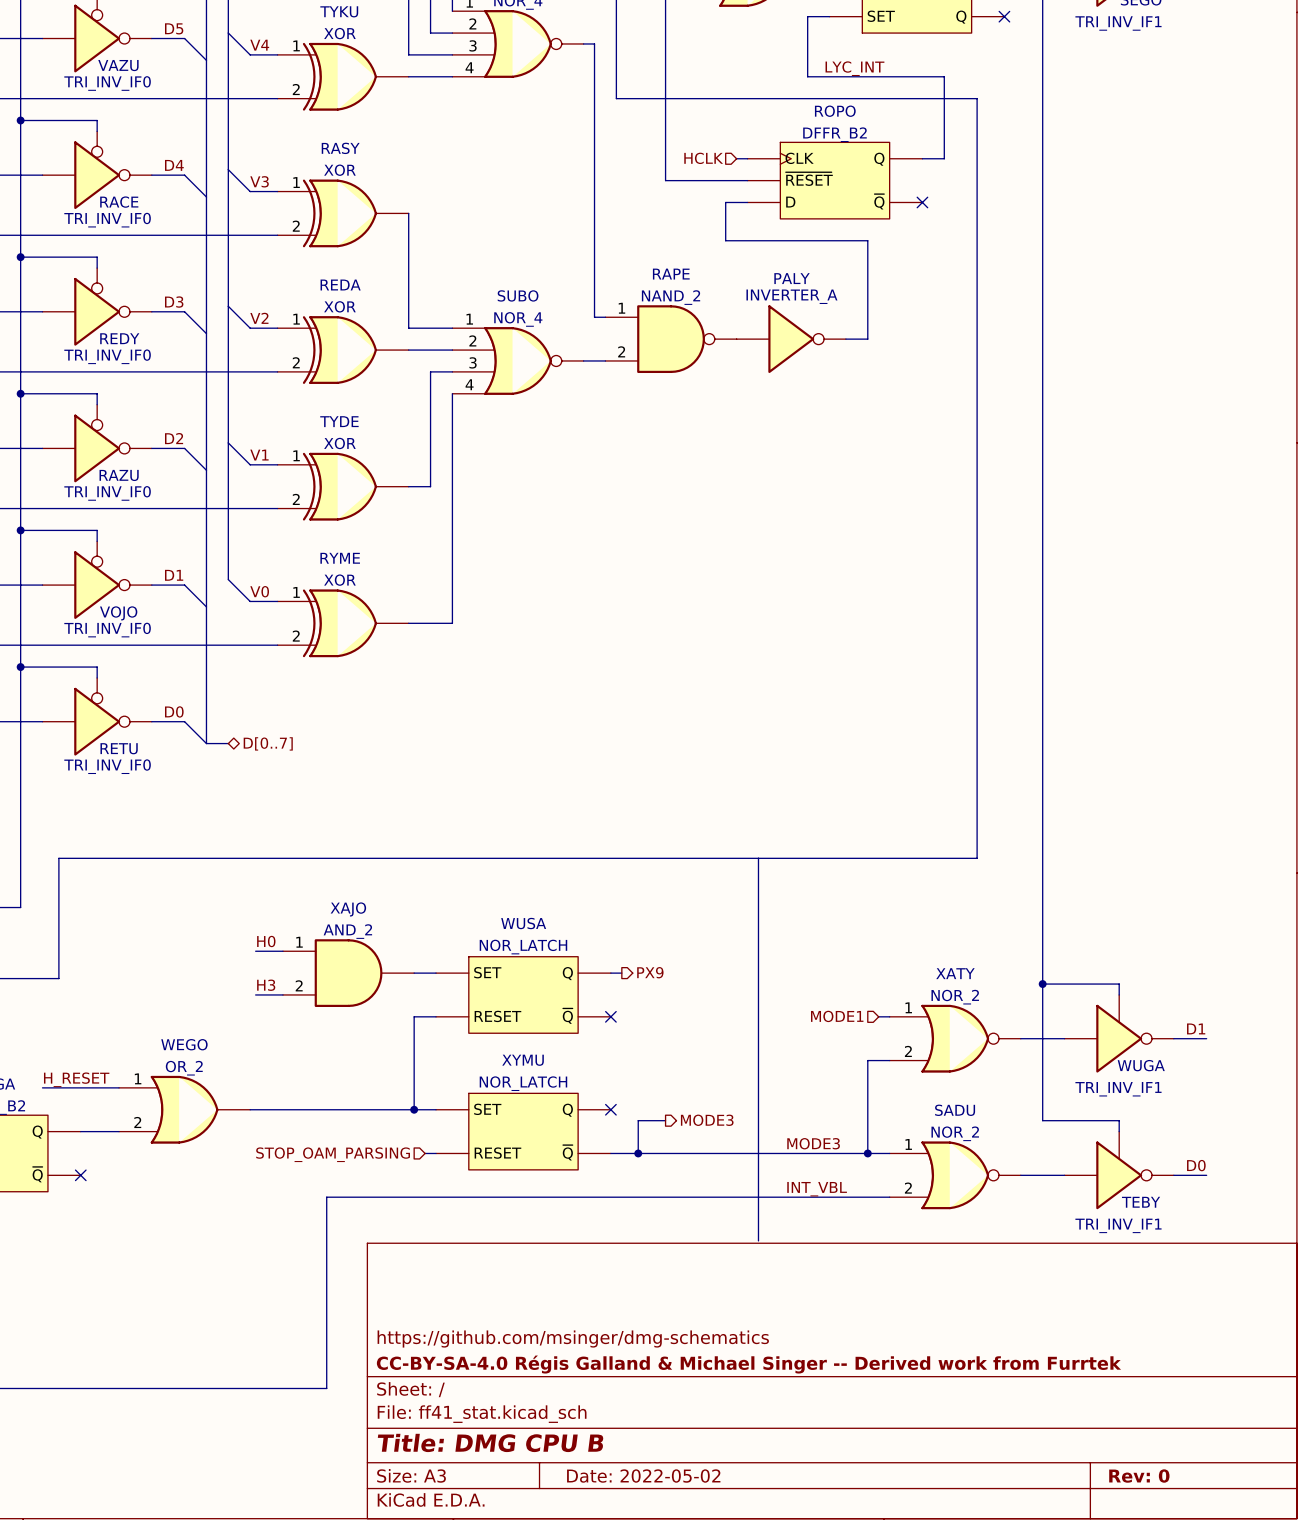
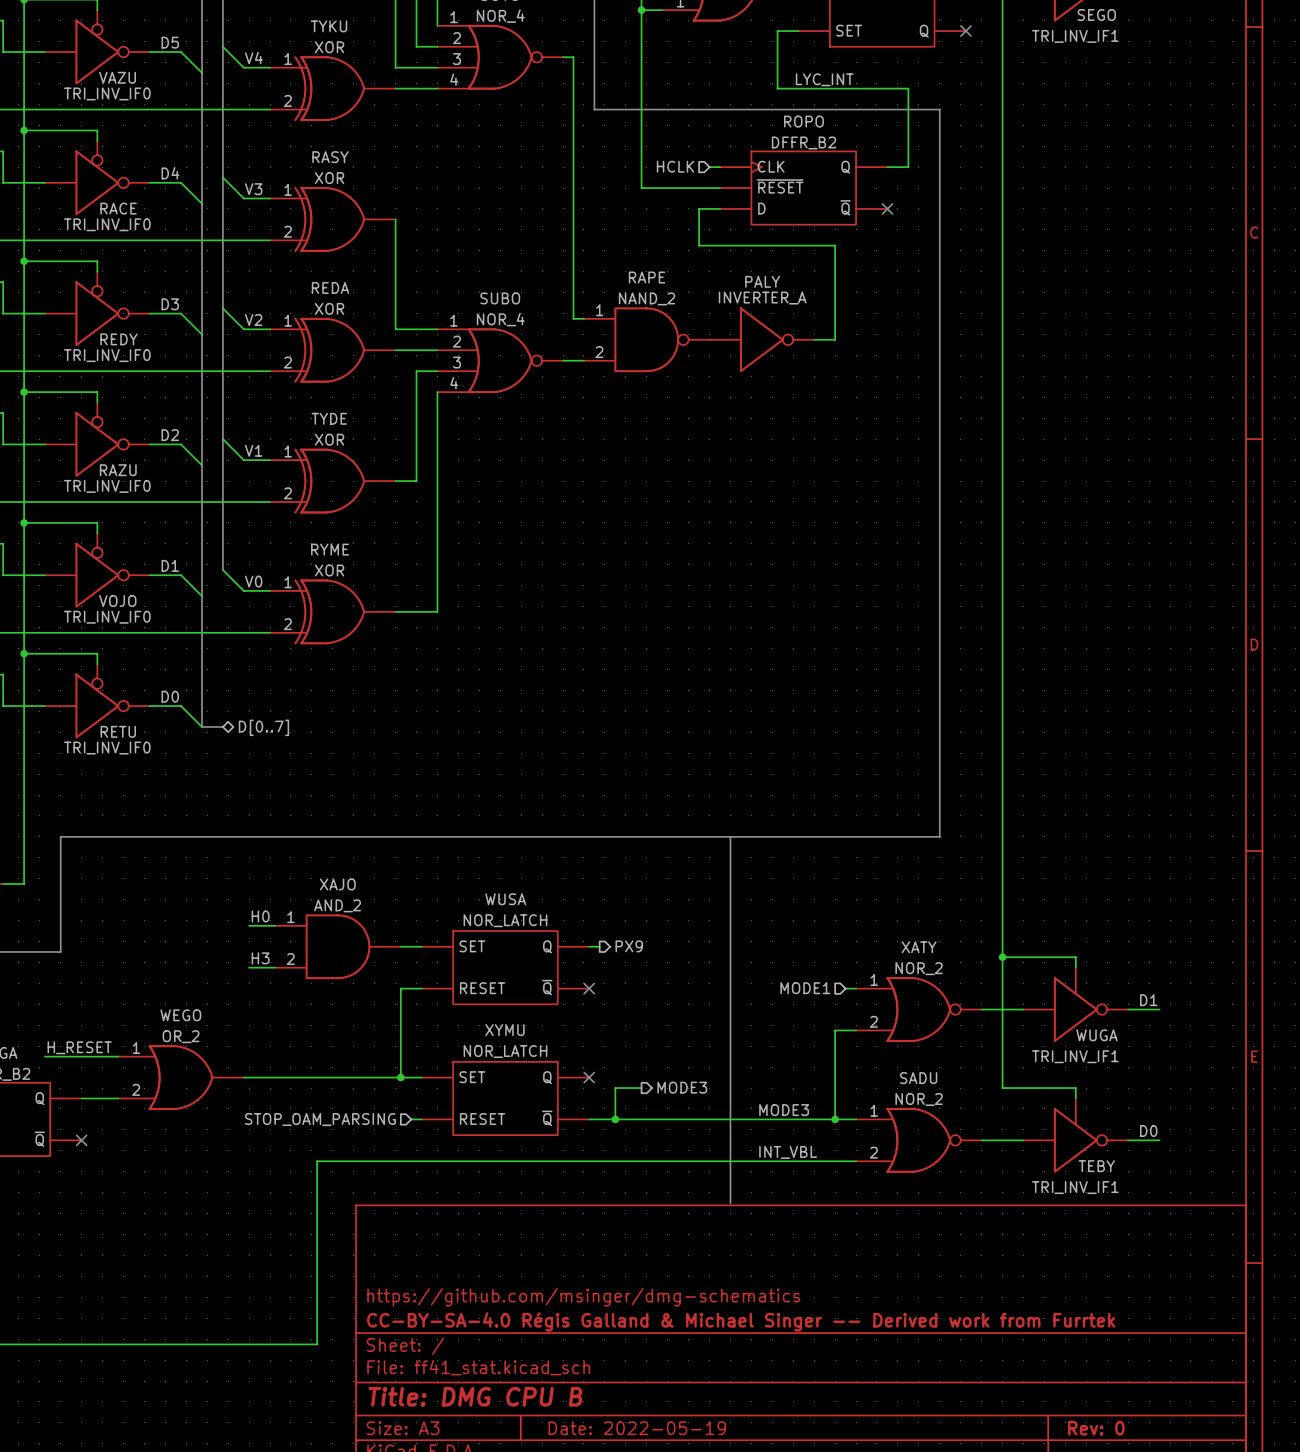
title block: Date: 2022-05-02 (643, 1476) -> Date: 2022-05-19 (637, 1428)

